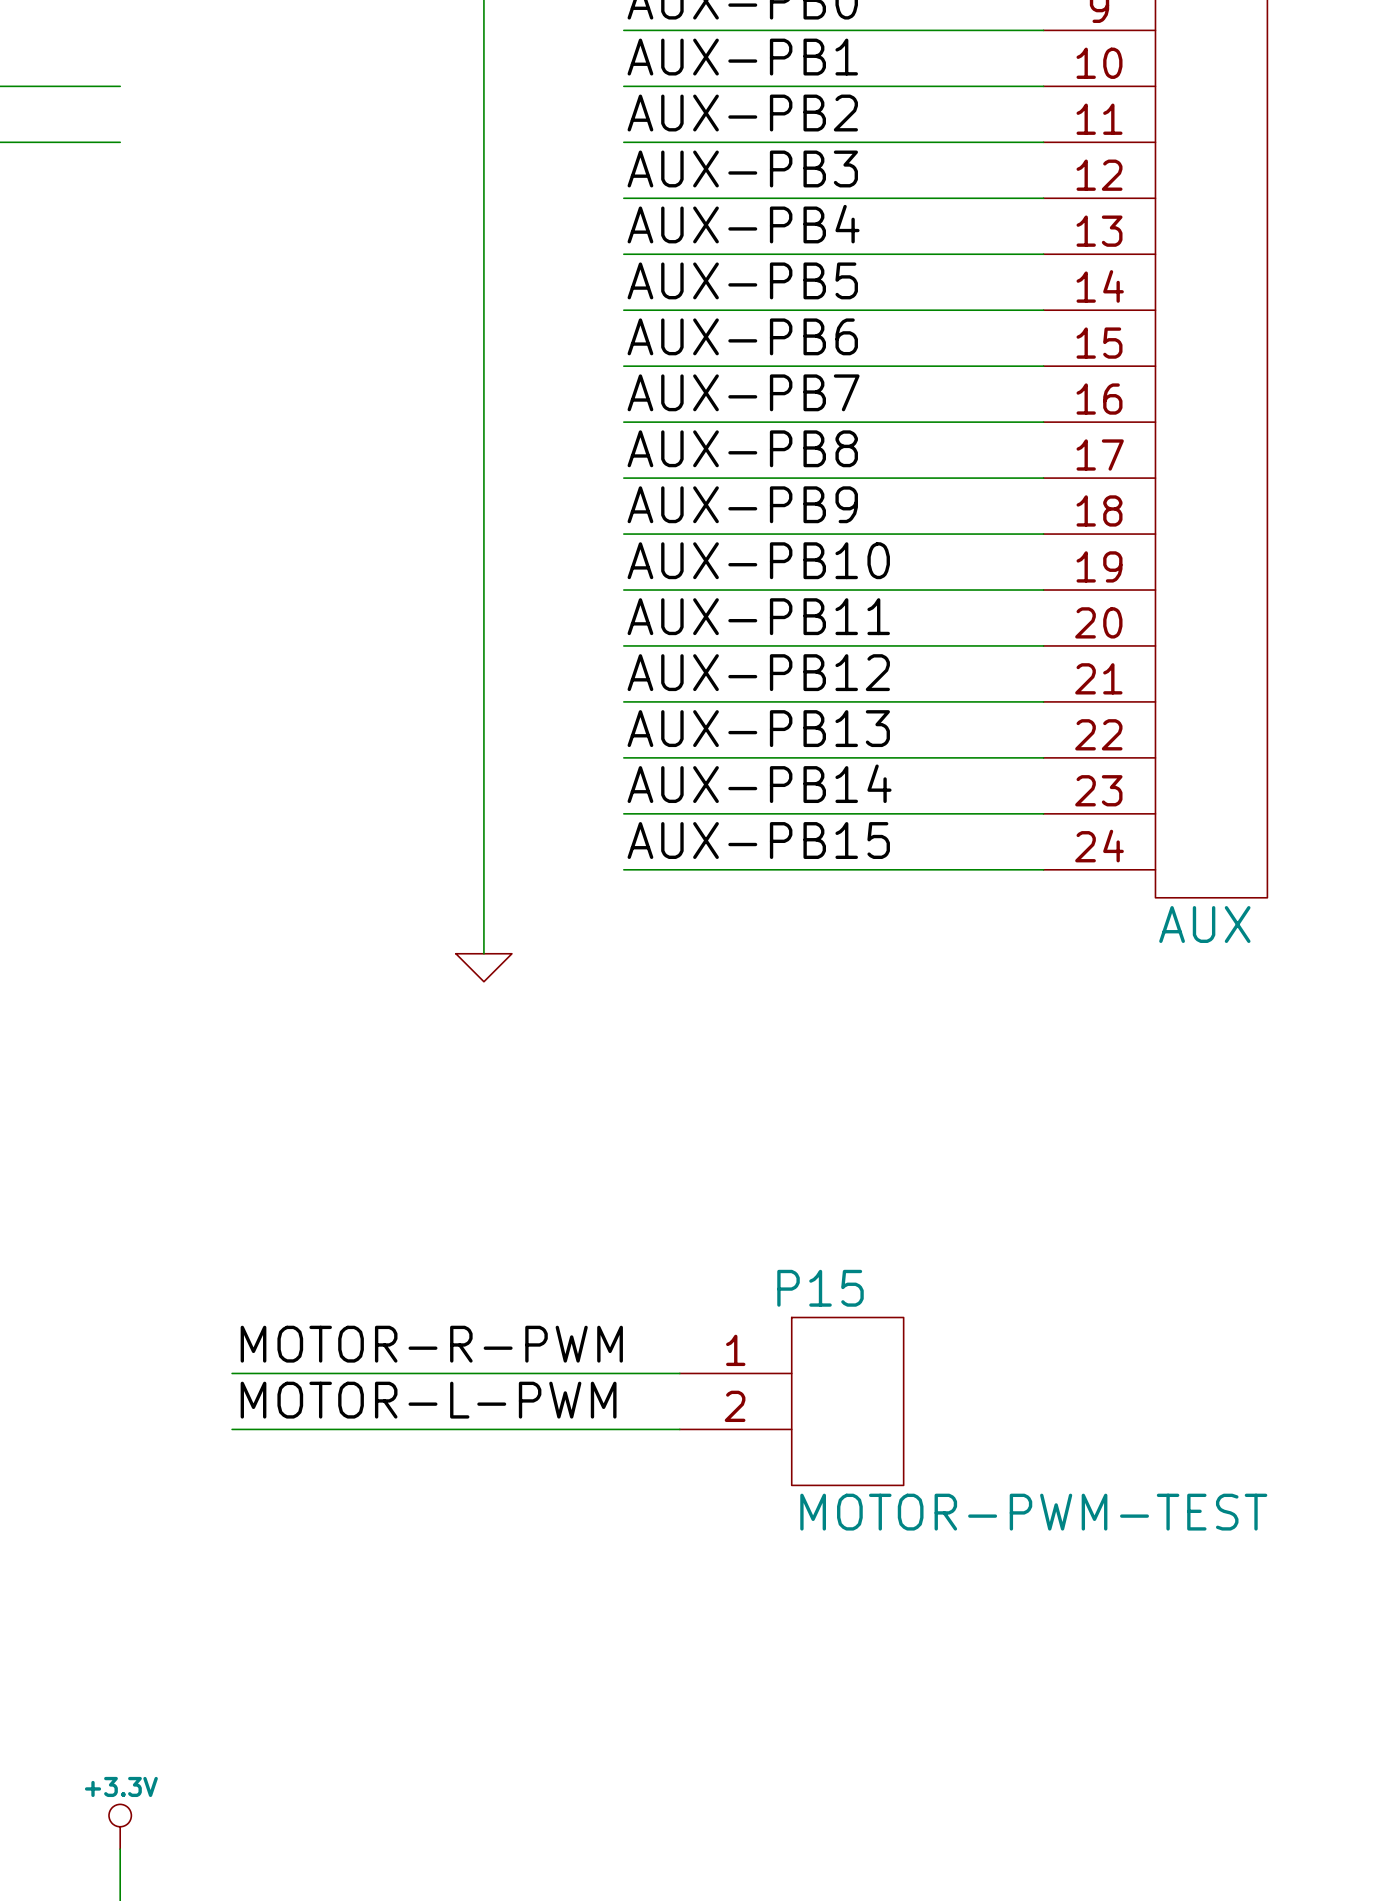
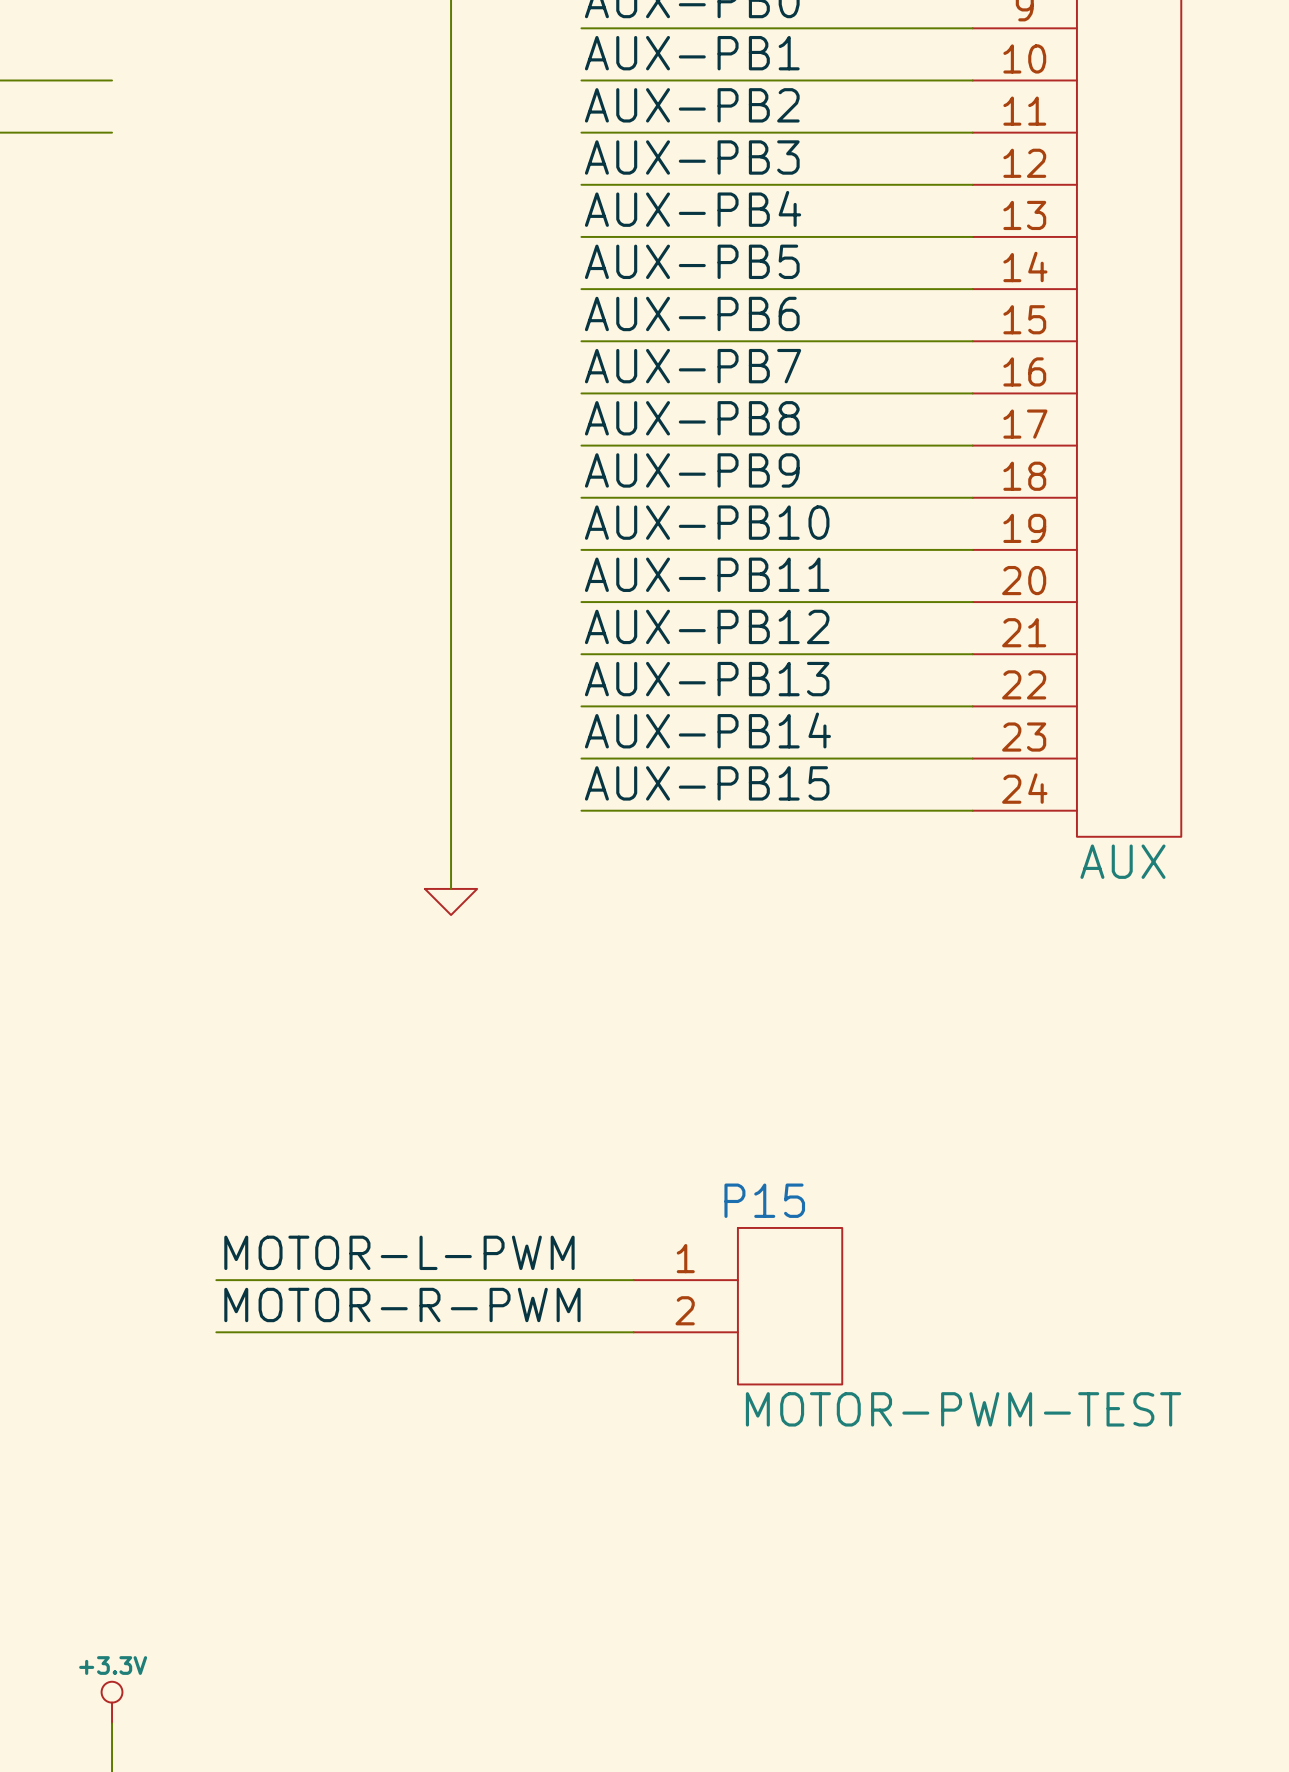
label: MOTOR-R-PWM (431, 1344) -> MOTOR-L-PWM (399, 1252)
label: MOTOR-L-PWM (428, 1400) -> MOTOR-R-PWM (402, 1304)

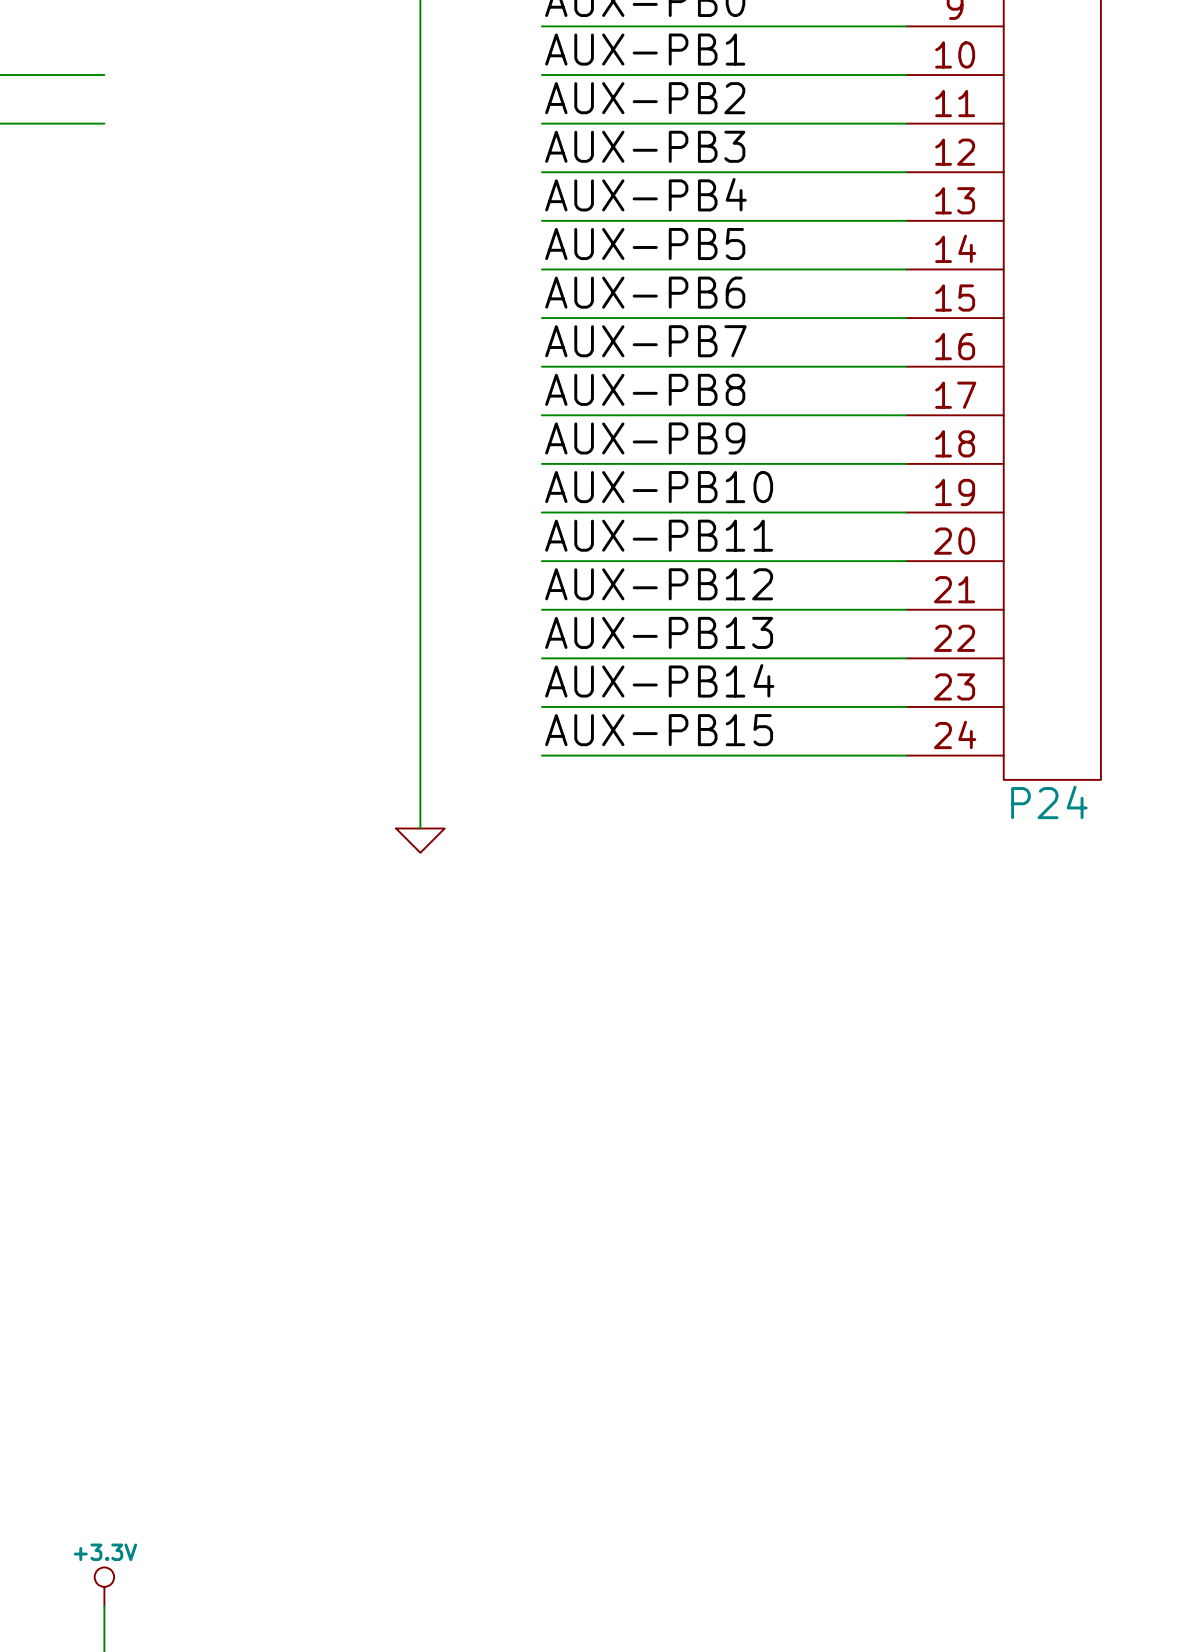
part value: AUX (1122, 861) -> P24 (1049, 802)
label: MOTOR-L-PWM (399, 1252) -> none
wire: (216, 1280) (633, 1280) -> none
label: MOTOR-R-PWM (402, 1304) -> none
P15: MOTOR-PWM-TEST (737, 1306) -> none
wire: (216, 1332) (633, 1332) -> none

